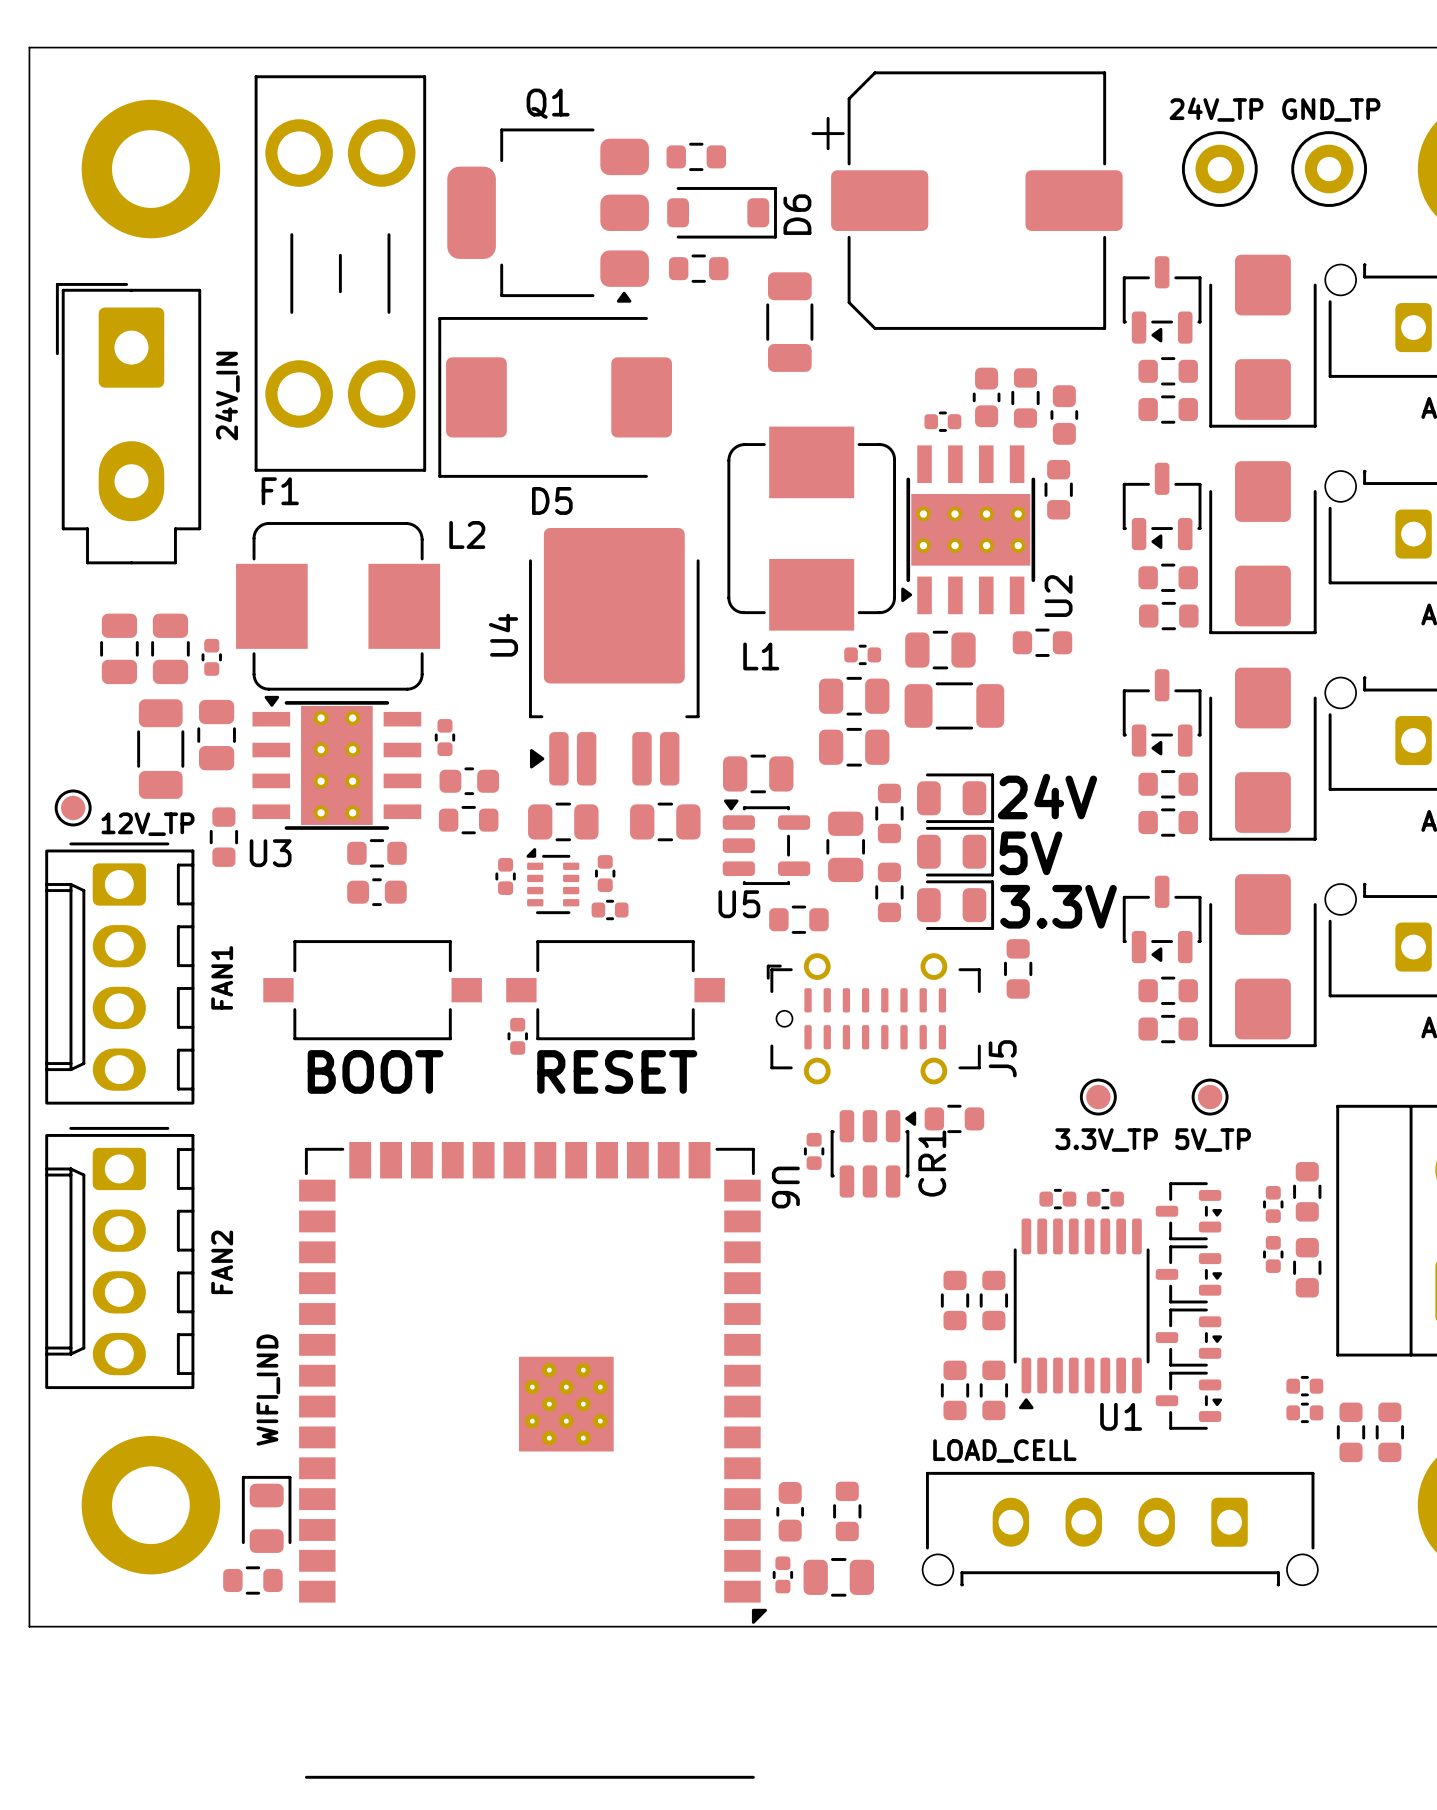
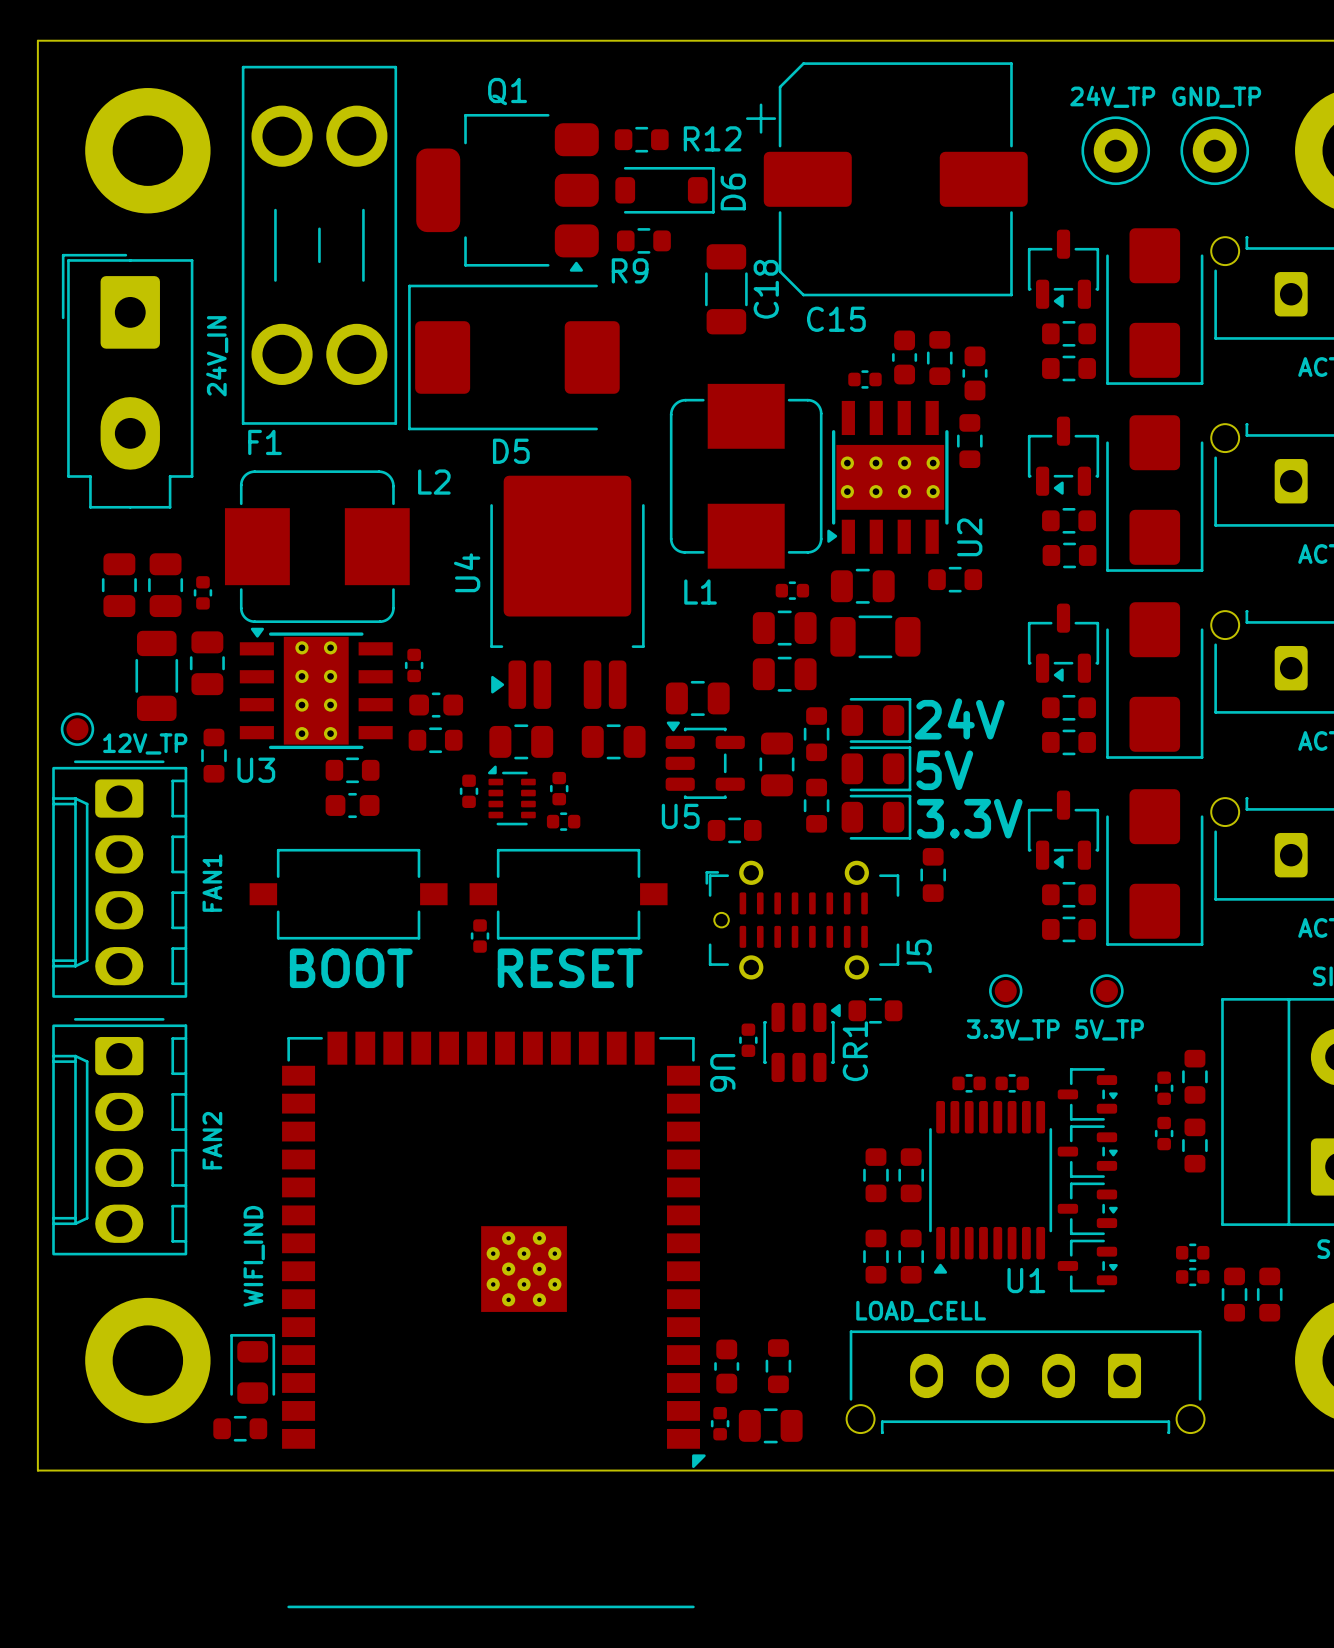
R12 name: none -> R12 (712, 138)
R9 name: none -> R9 (630, 270)
C18 name: none -> C18 (766, 289)
C15 name: none -> C15 (836, 319)

